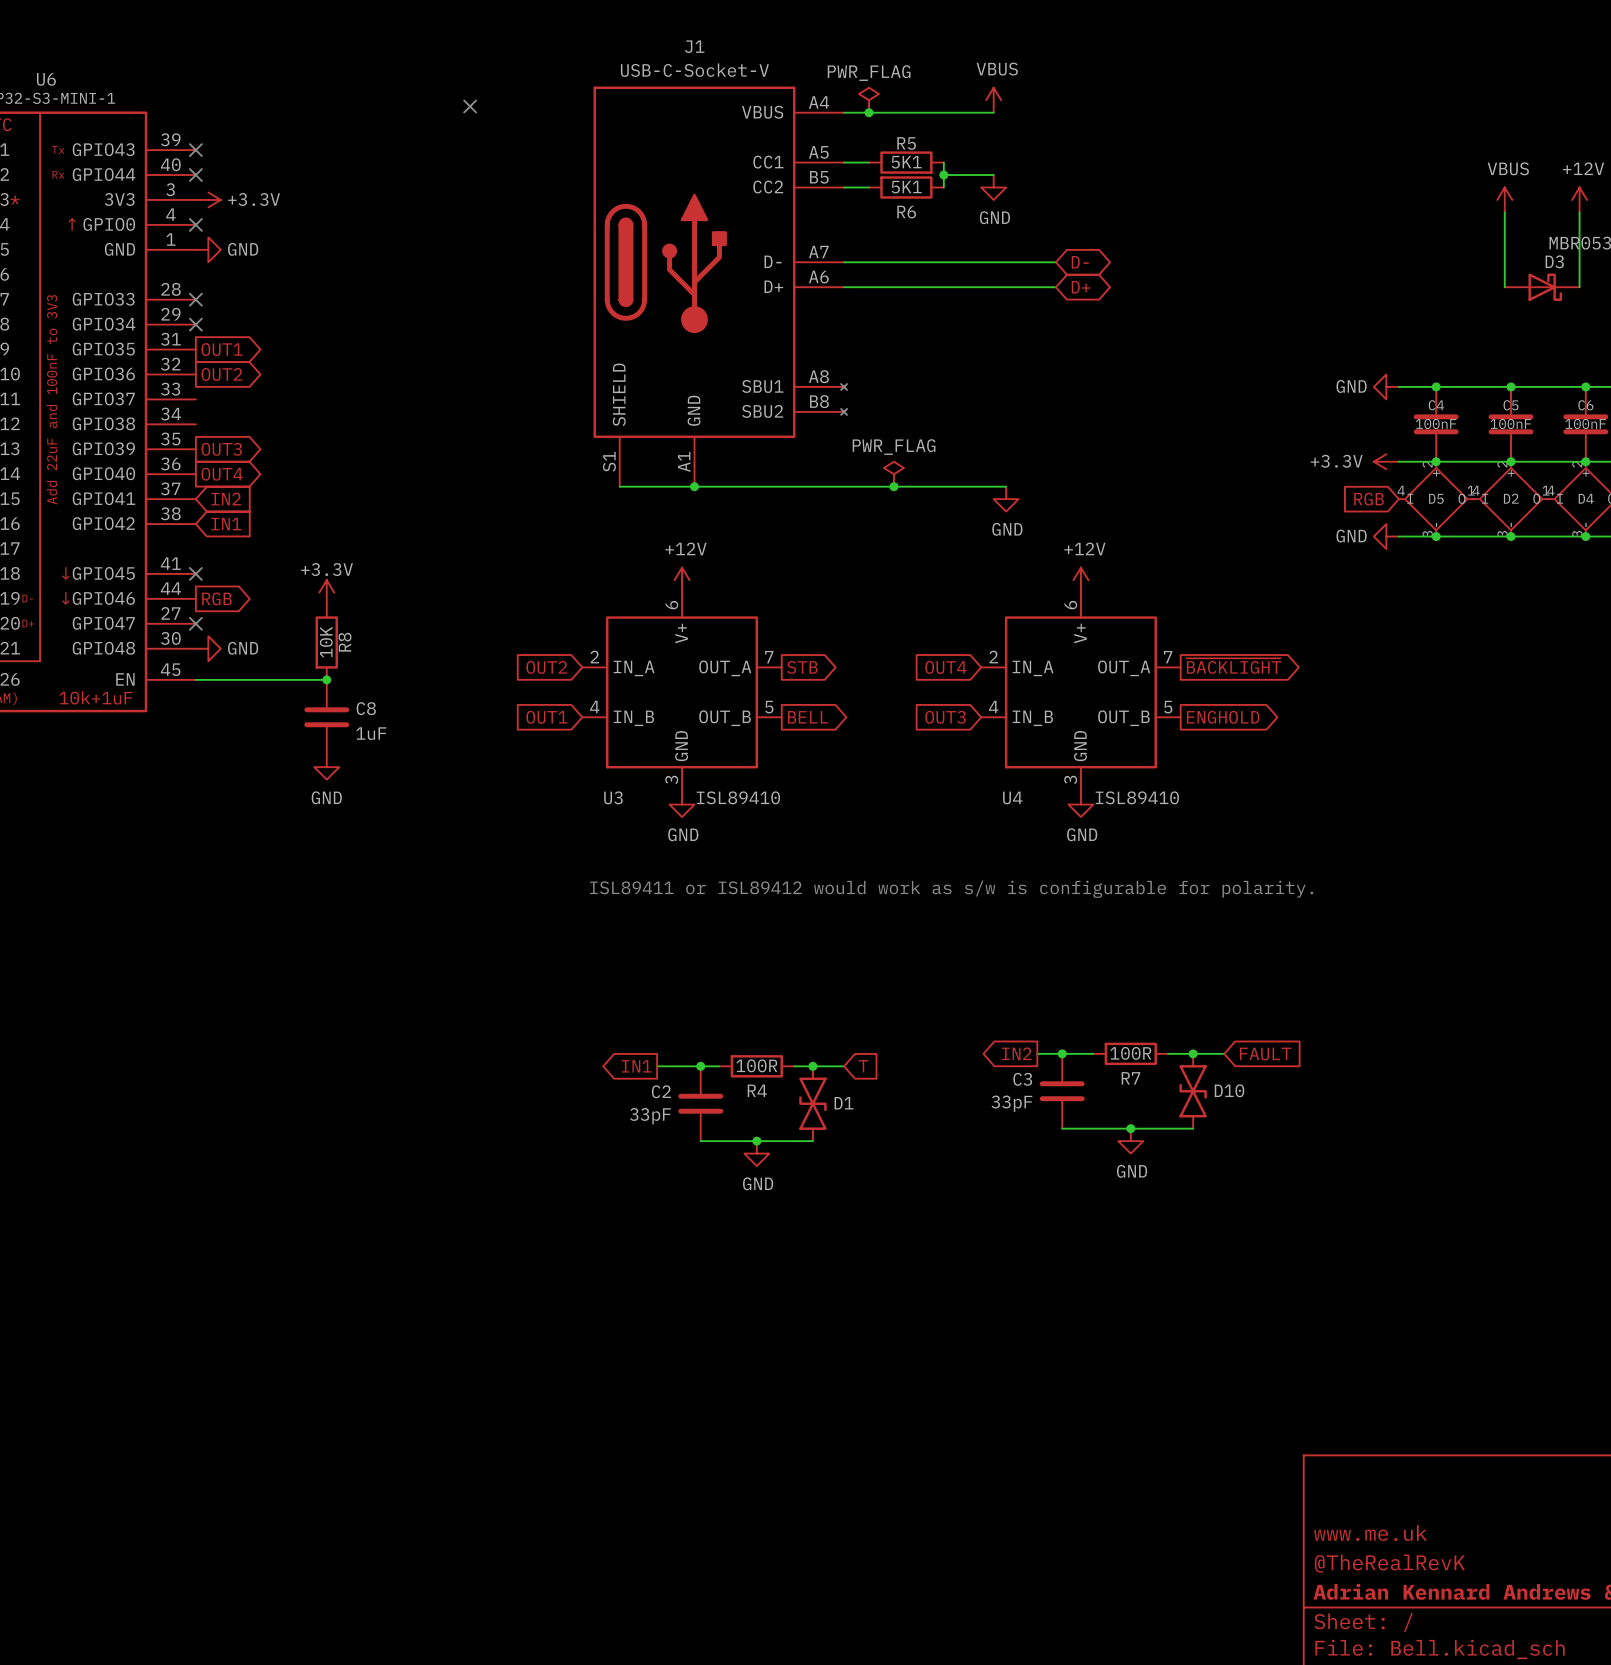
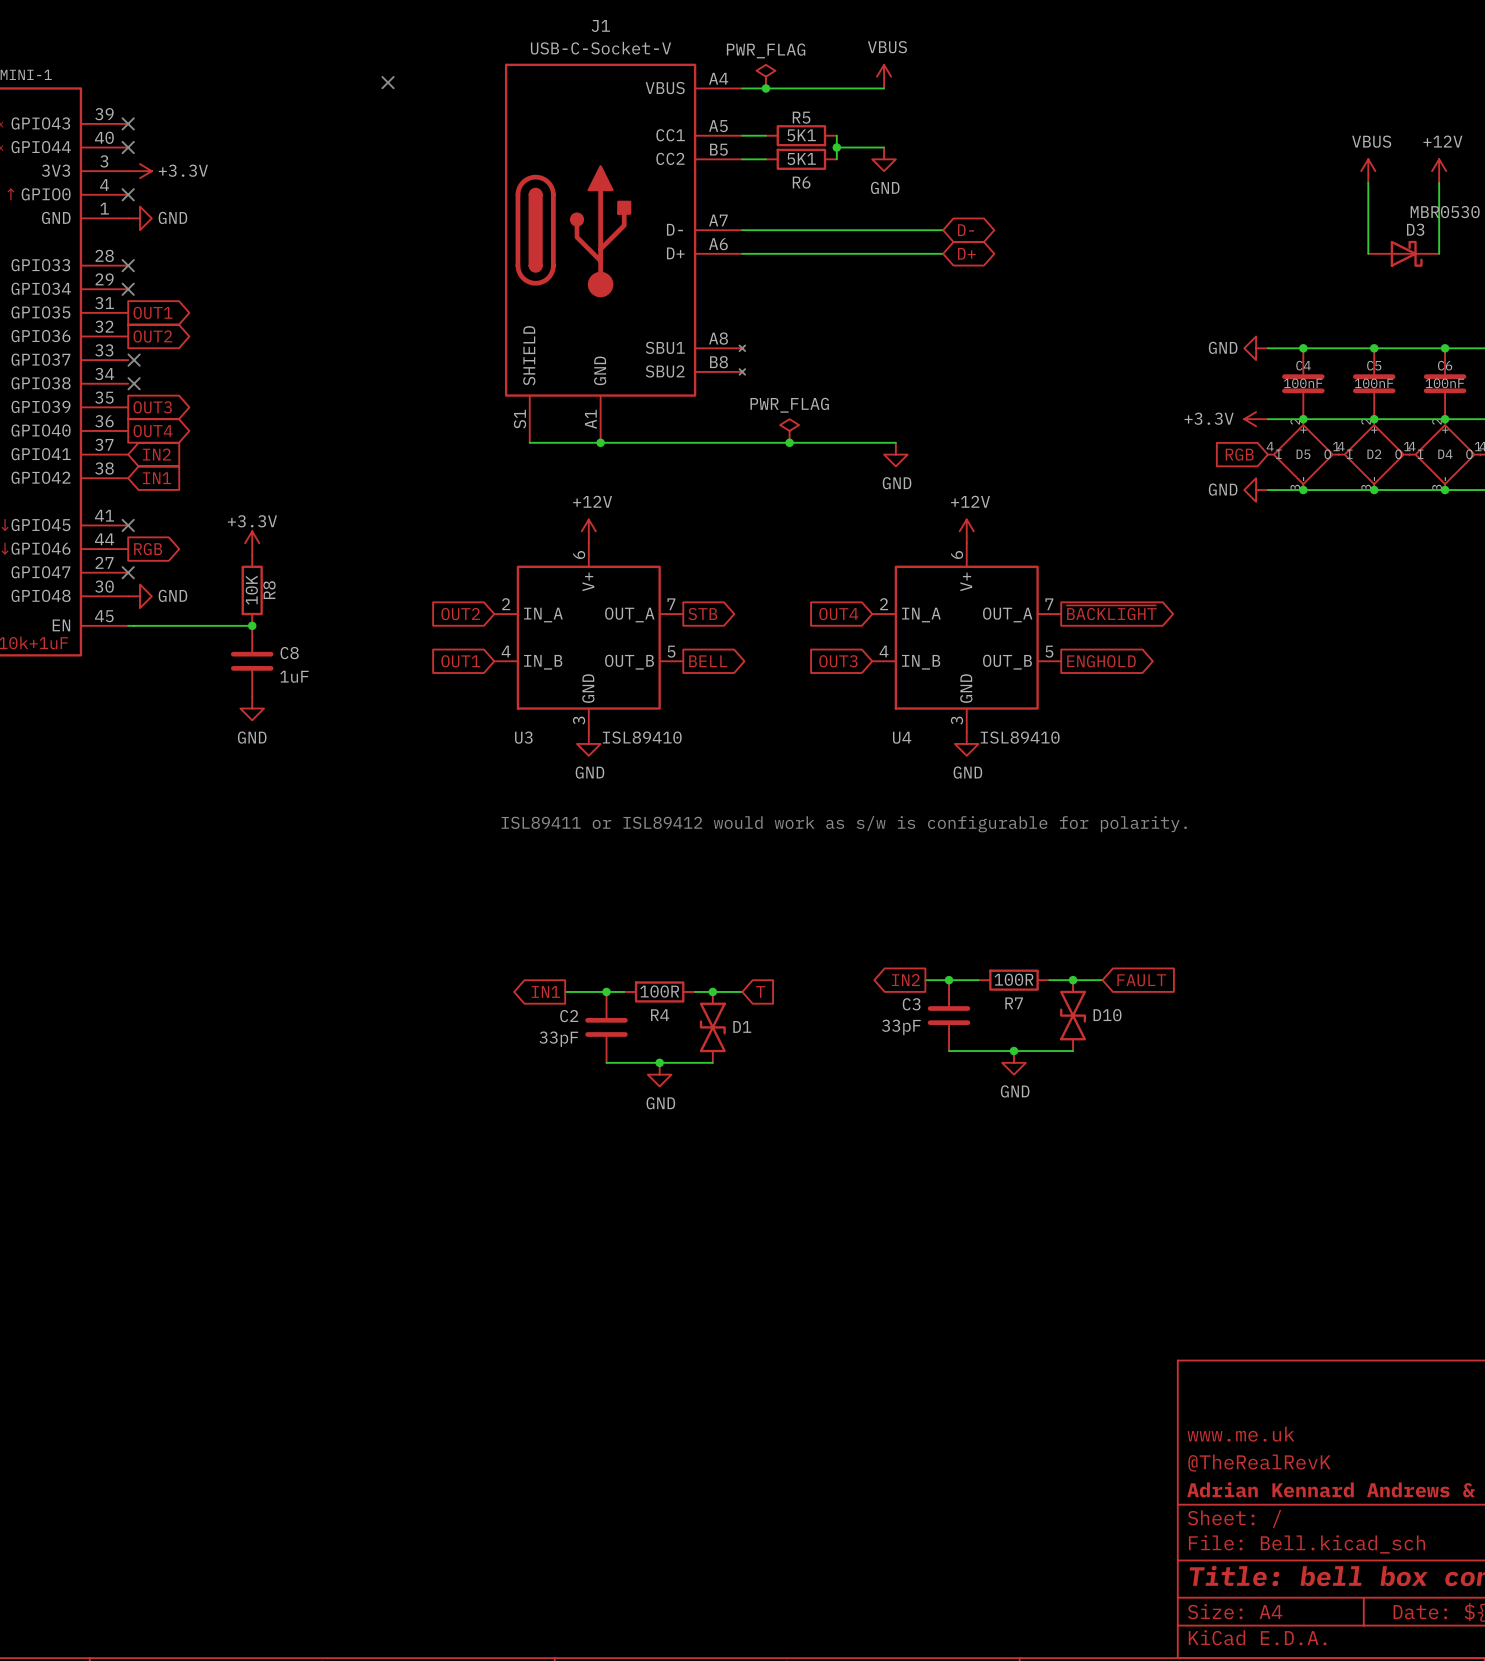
no-connect mark: none -> (134, 360)
no-connect mark: none -> (134, 383)

